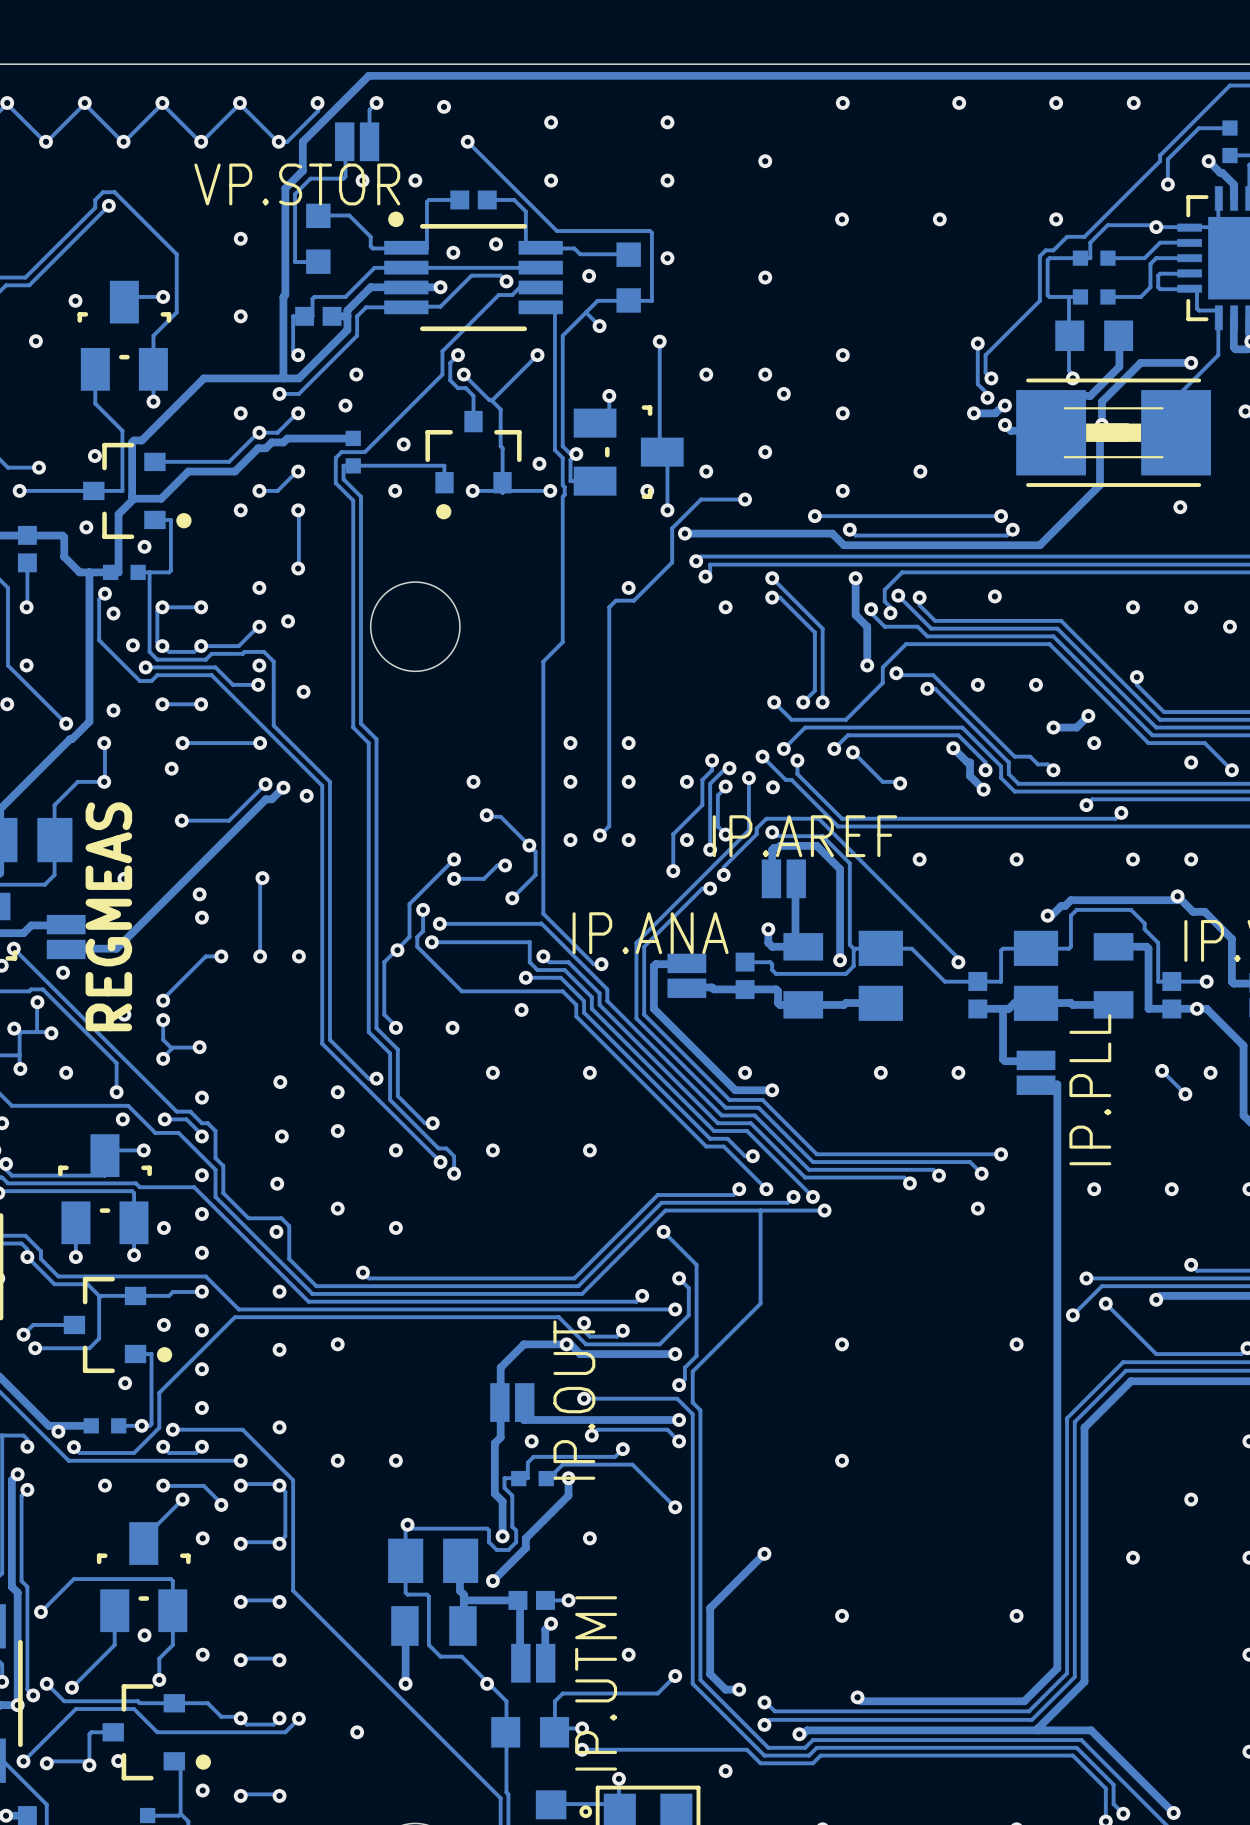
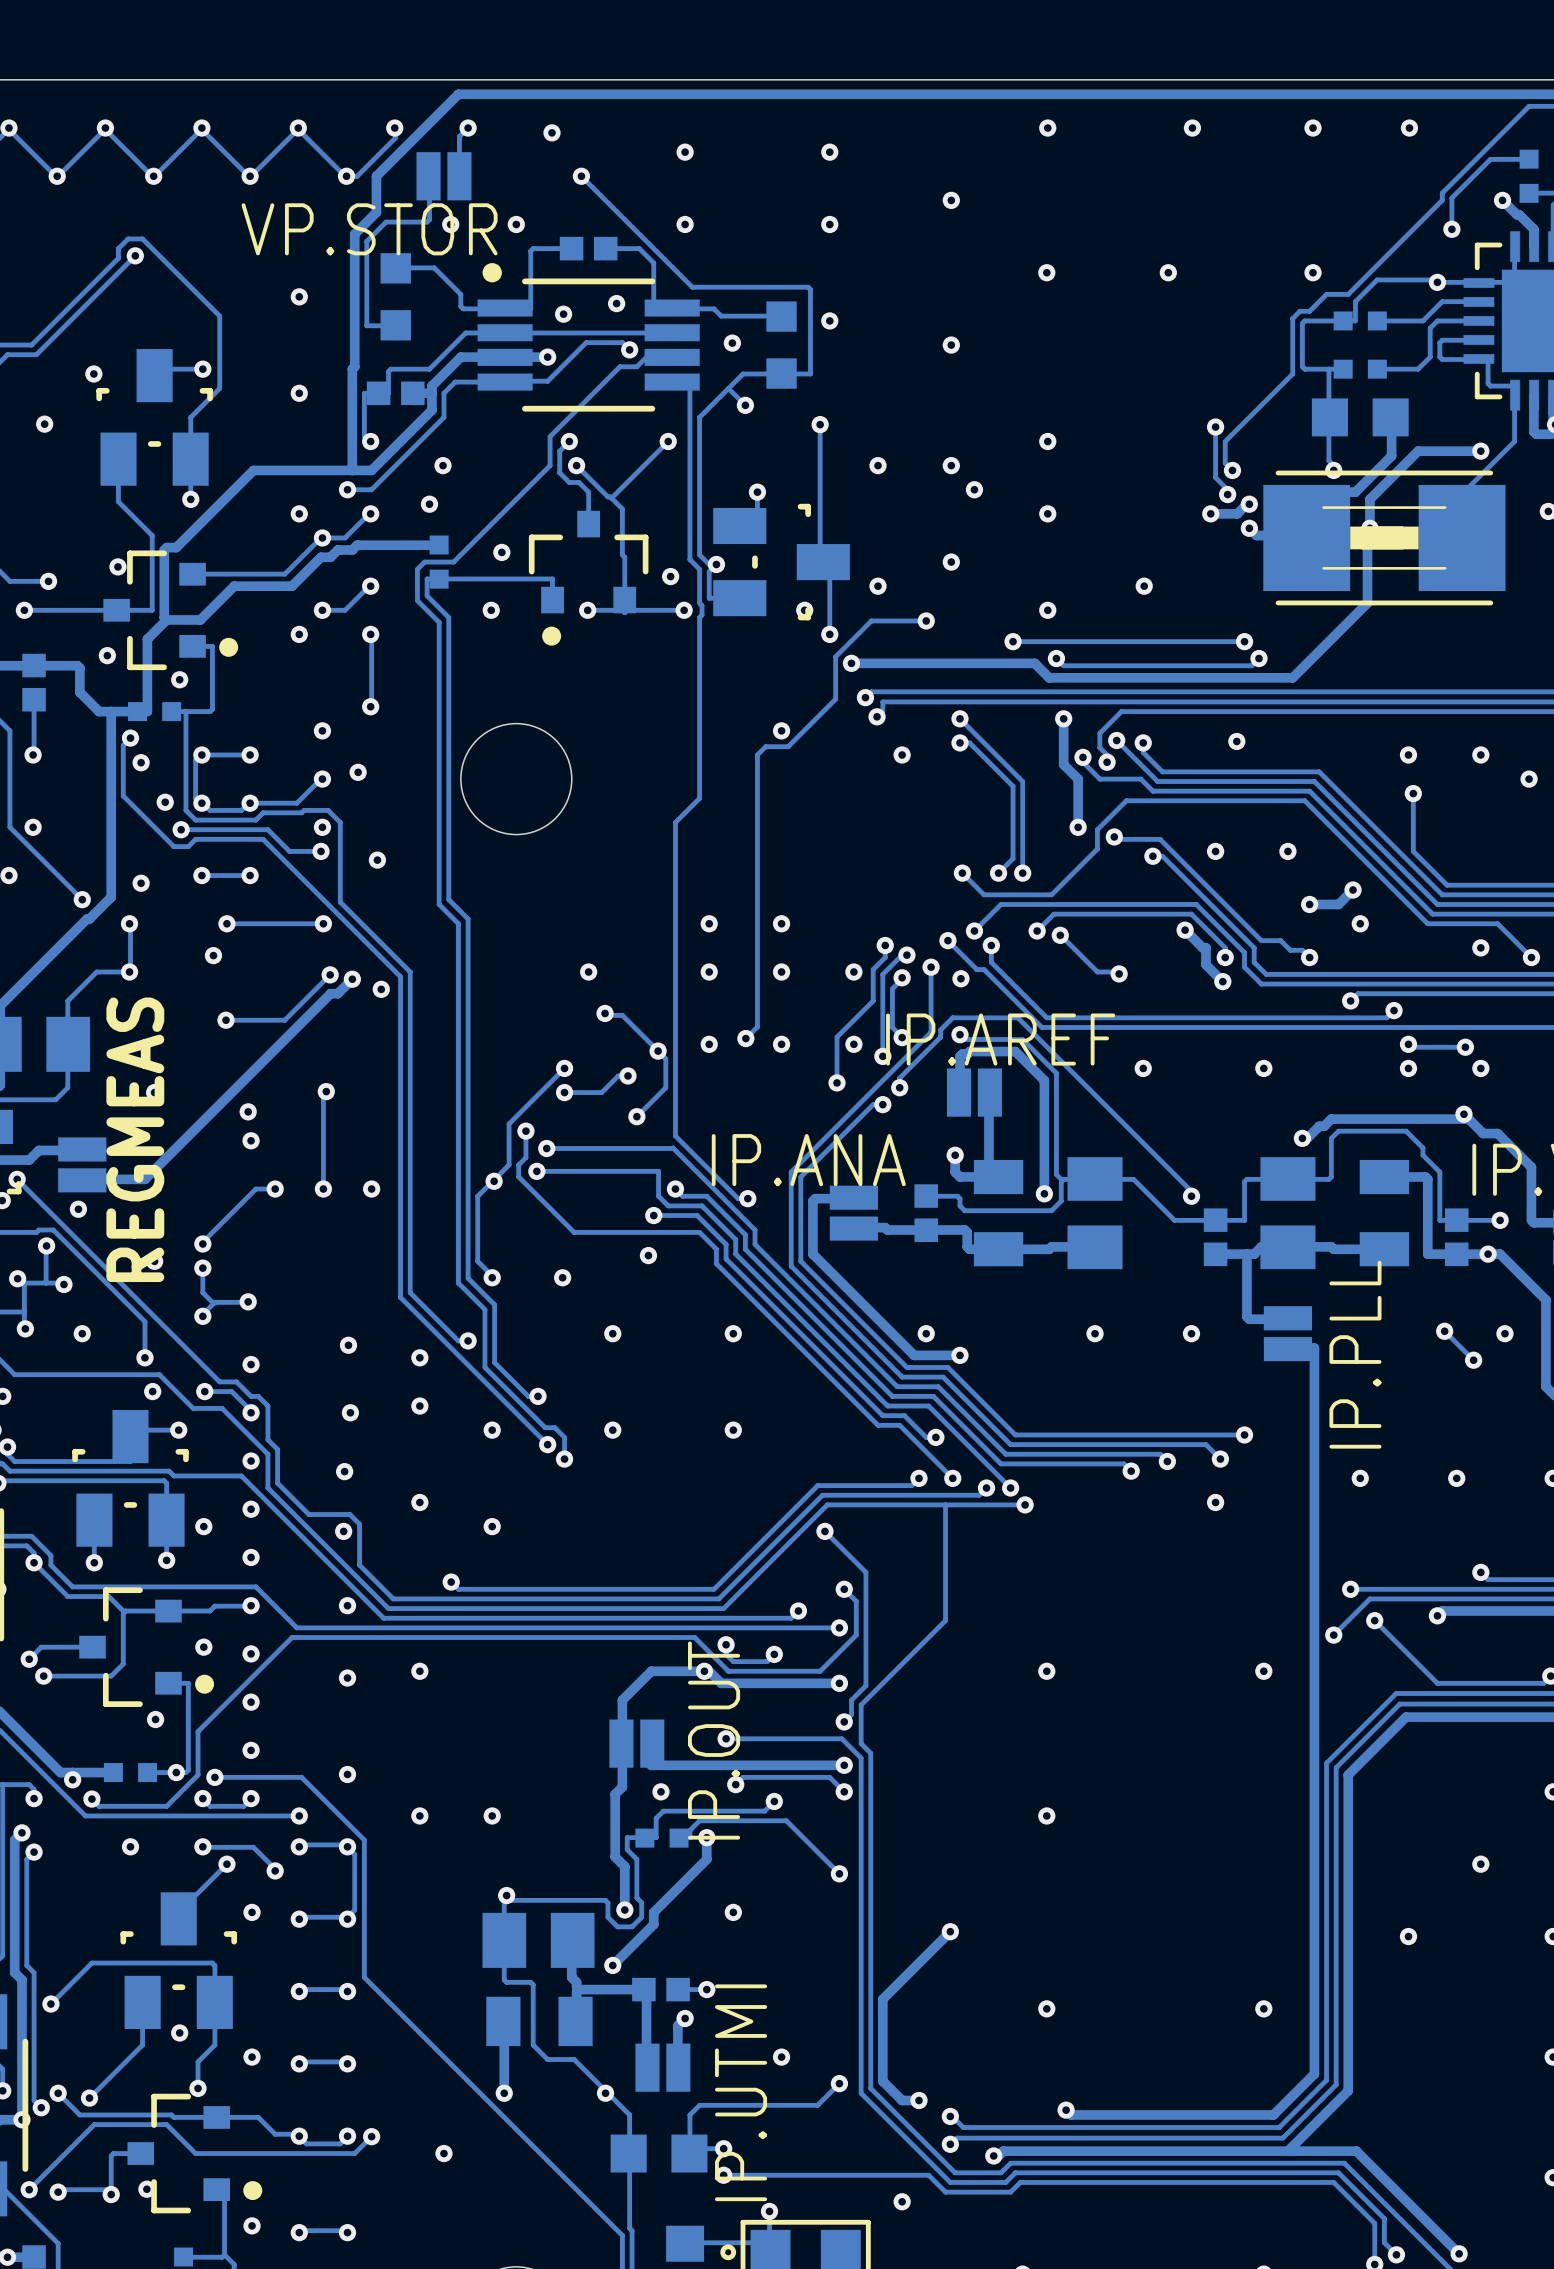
via: (1180, 507) -> none
track: none -> (1413, 793) (1413, 841)
via position: (1136, 677) -> (1413, 793)
track: none -> (1408, 1044) (1411, 1047) (1465, 1047)
via: none -> (1408, 1044)
via: none -> (1465, 1047)

